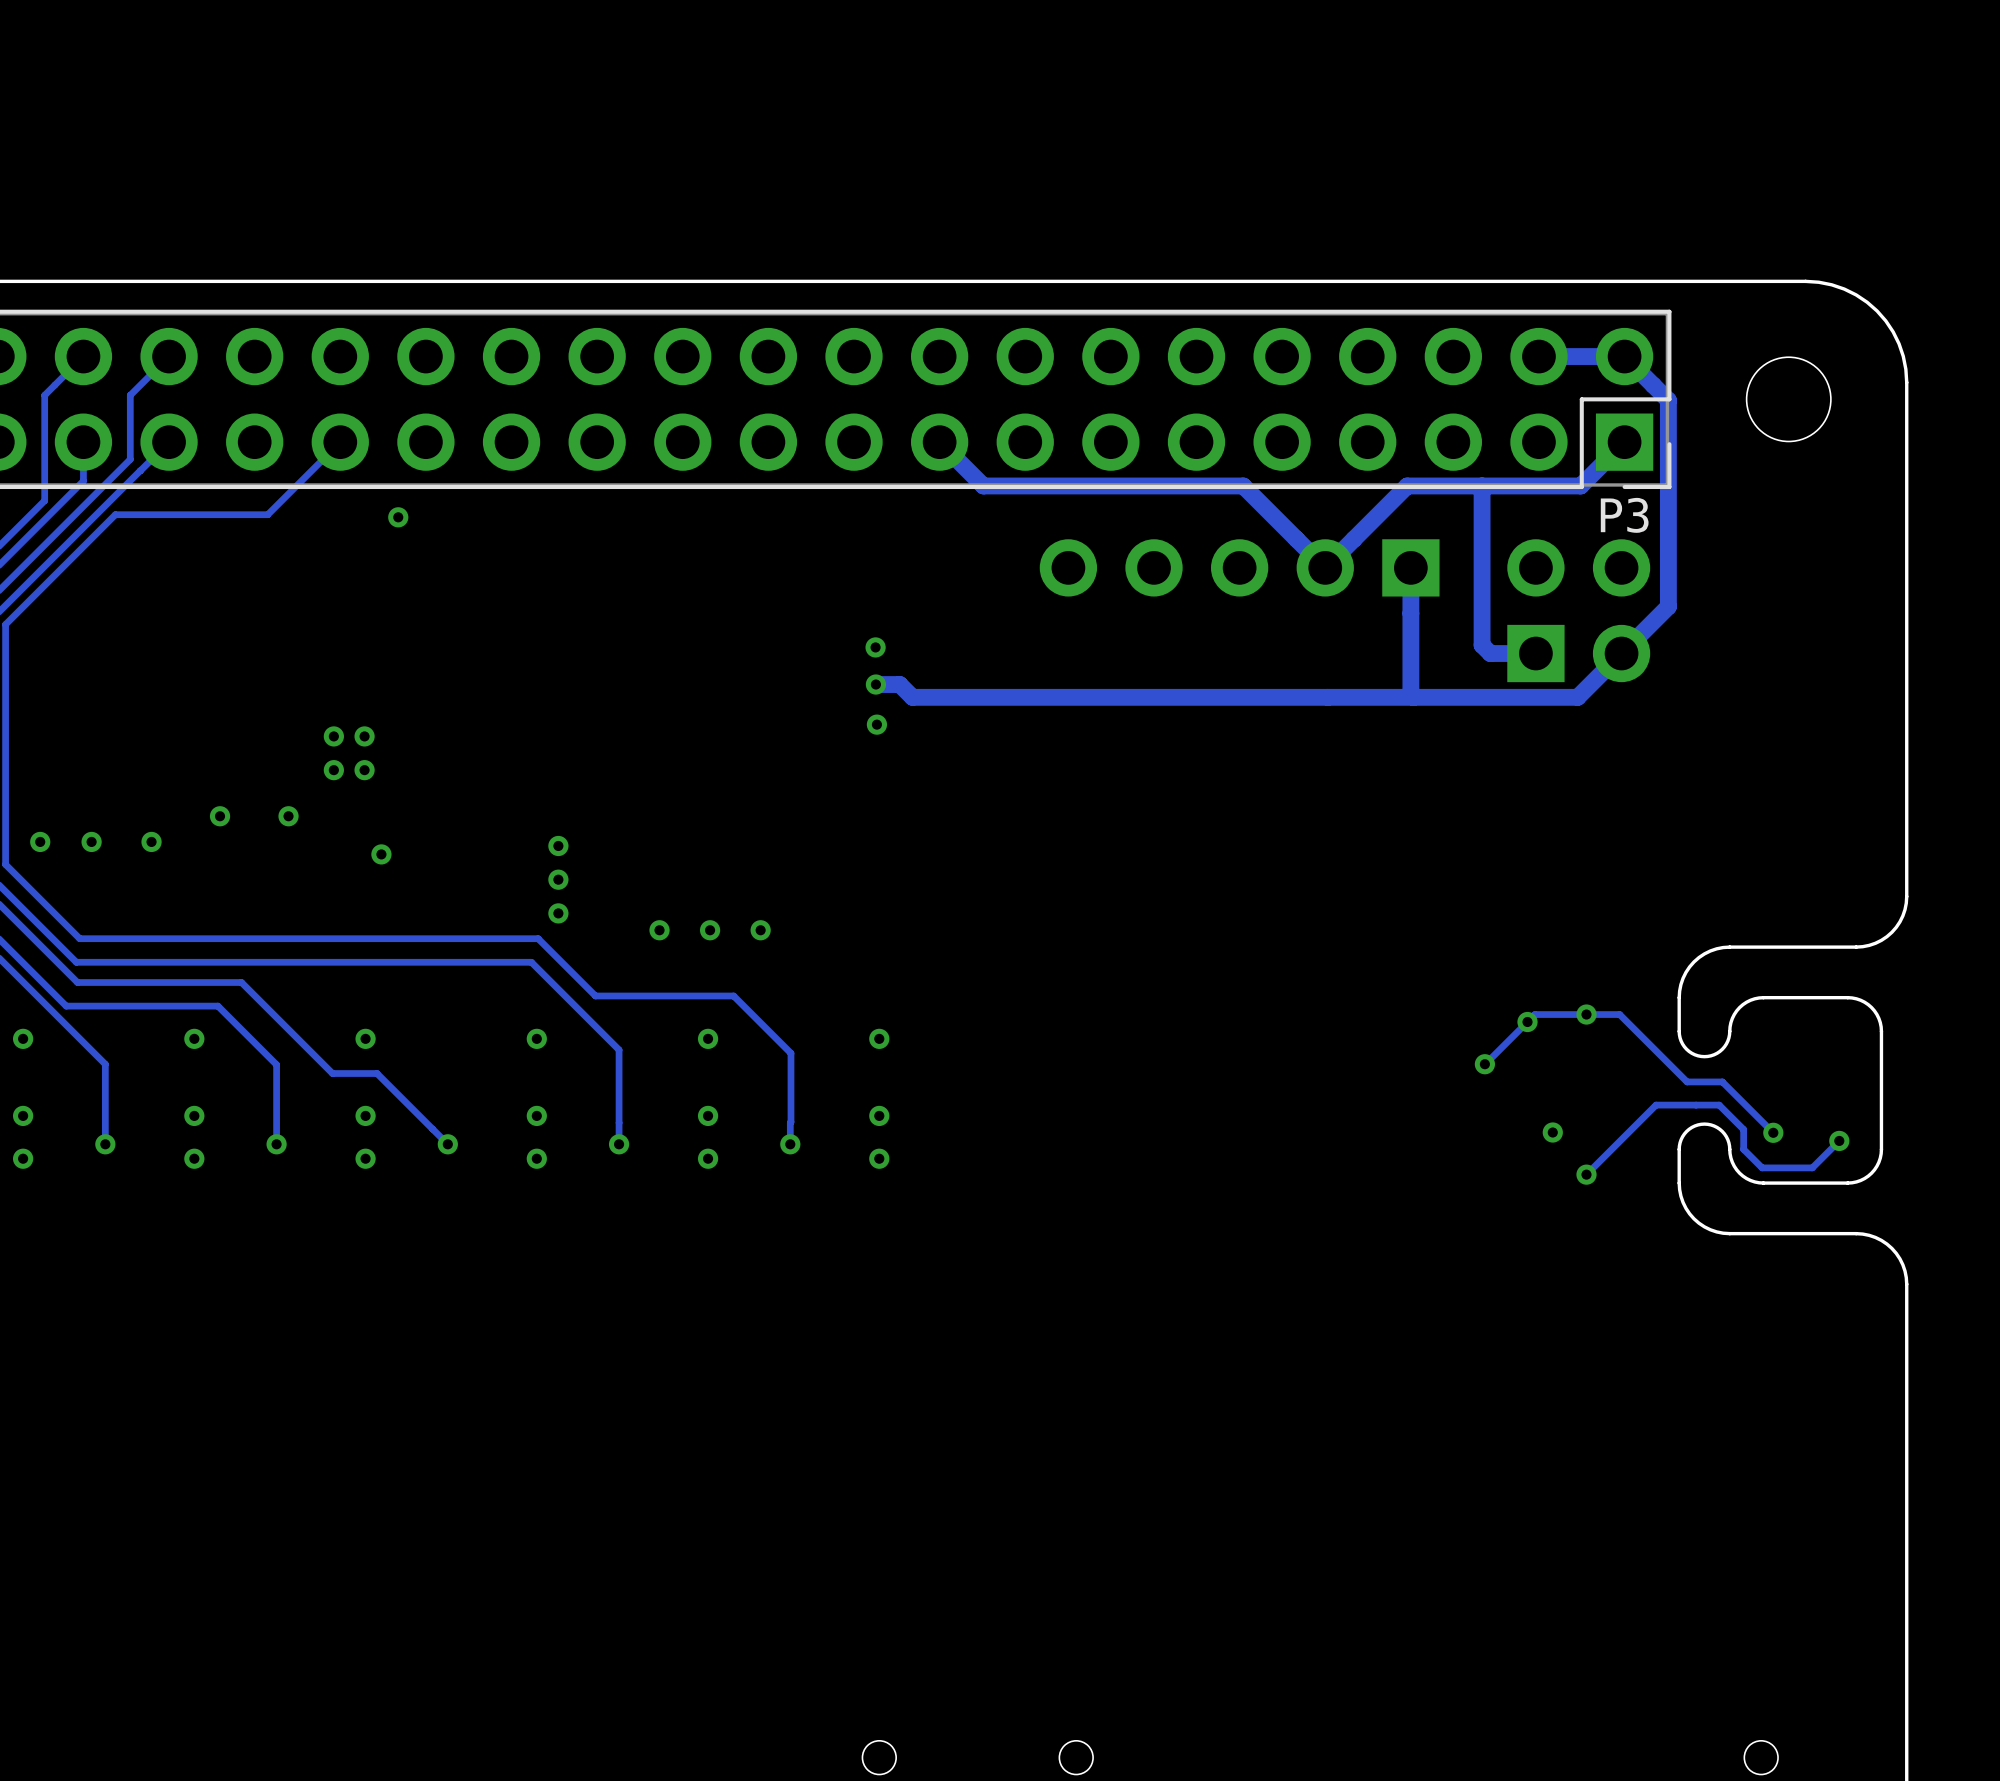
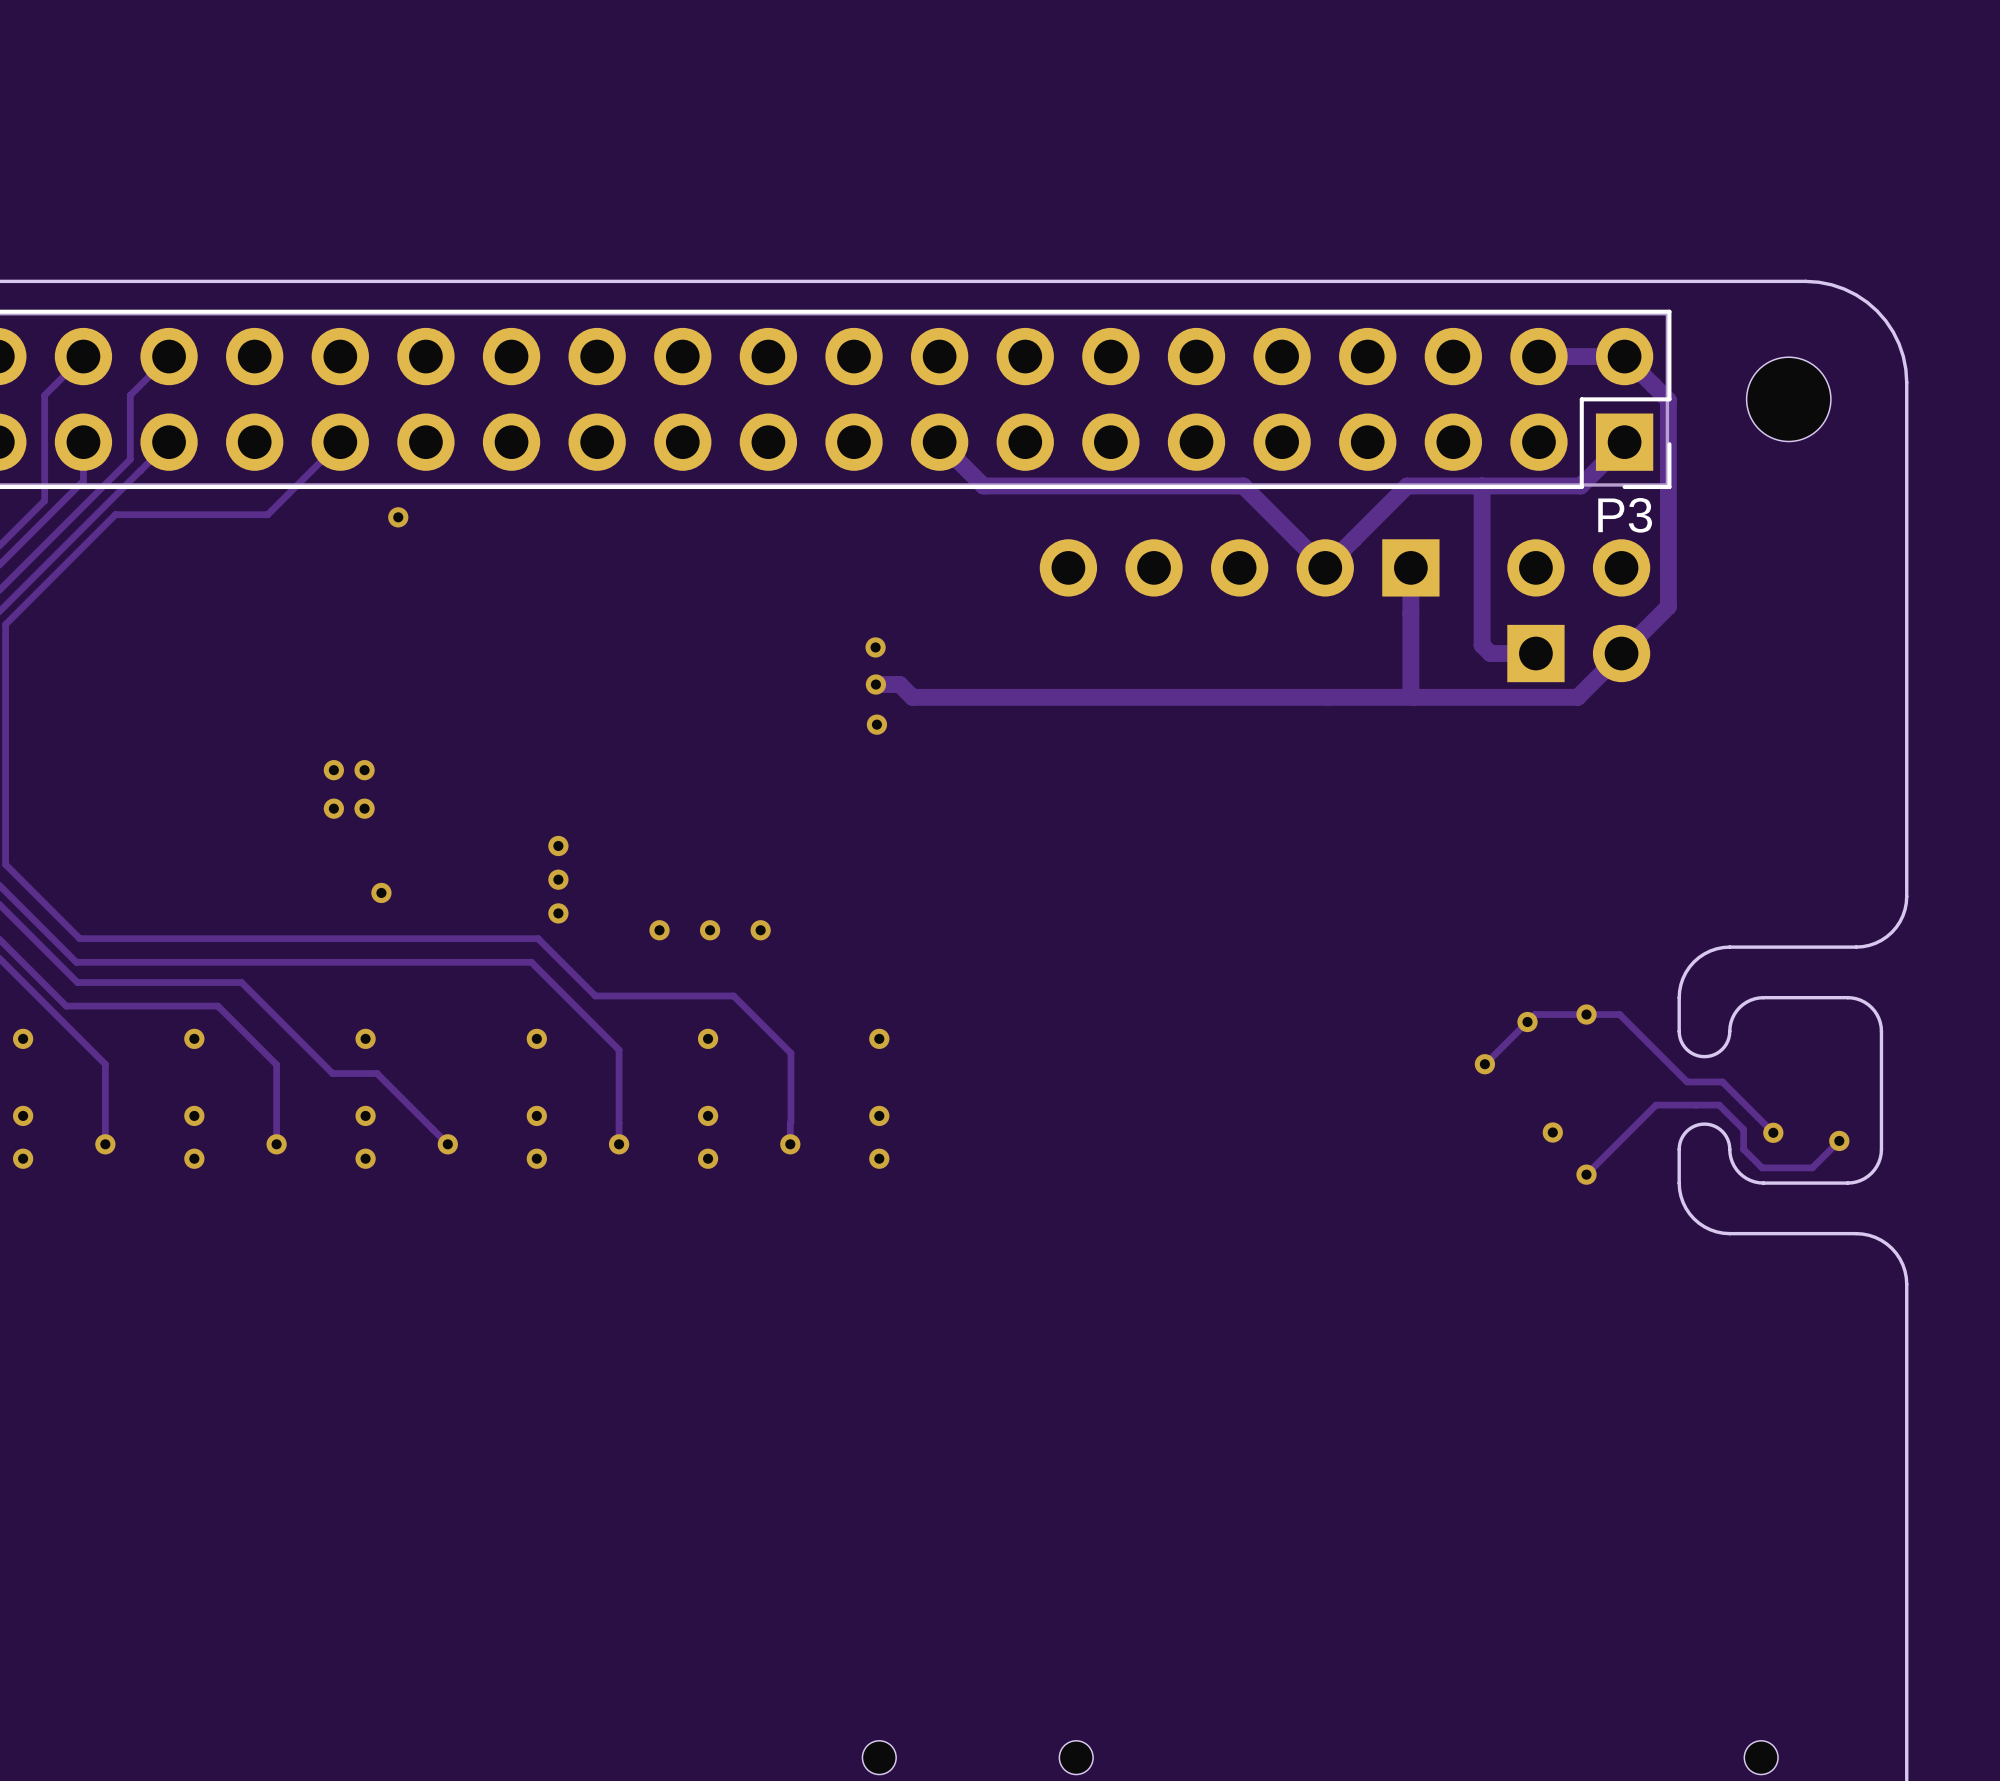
via: (333, 736) -> none
via: (364, 736) -> none
via: none -> (333, 808)
via: none -> (364, 808)
via: (220, 816) -> none
via: (288, 816) -> none
via: (40, 841) -> none
via: (91, 841) -> none
via: (151, 841) -> none
via: (381, 854) -> none
via: none -> (381, 892)

